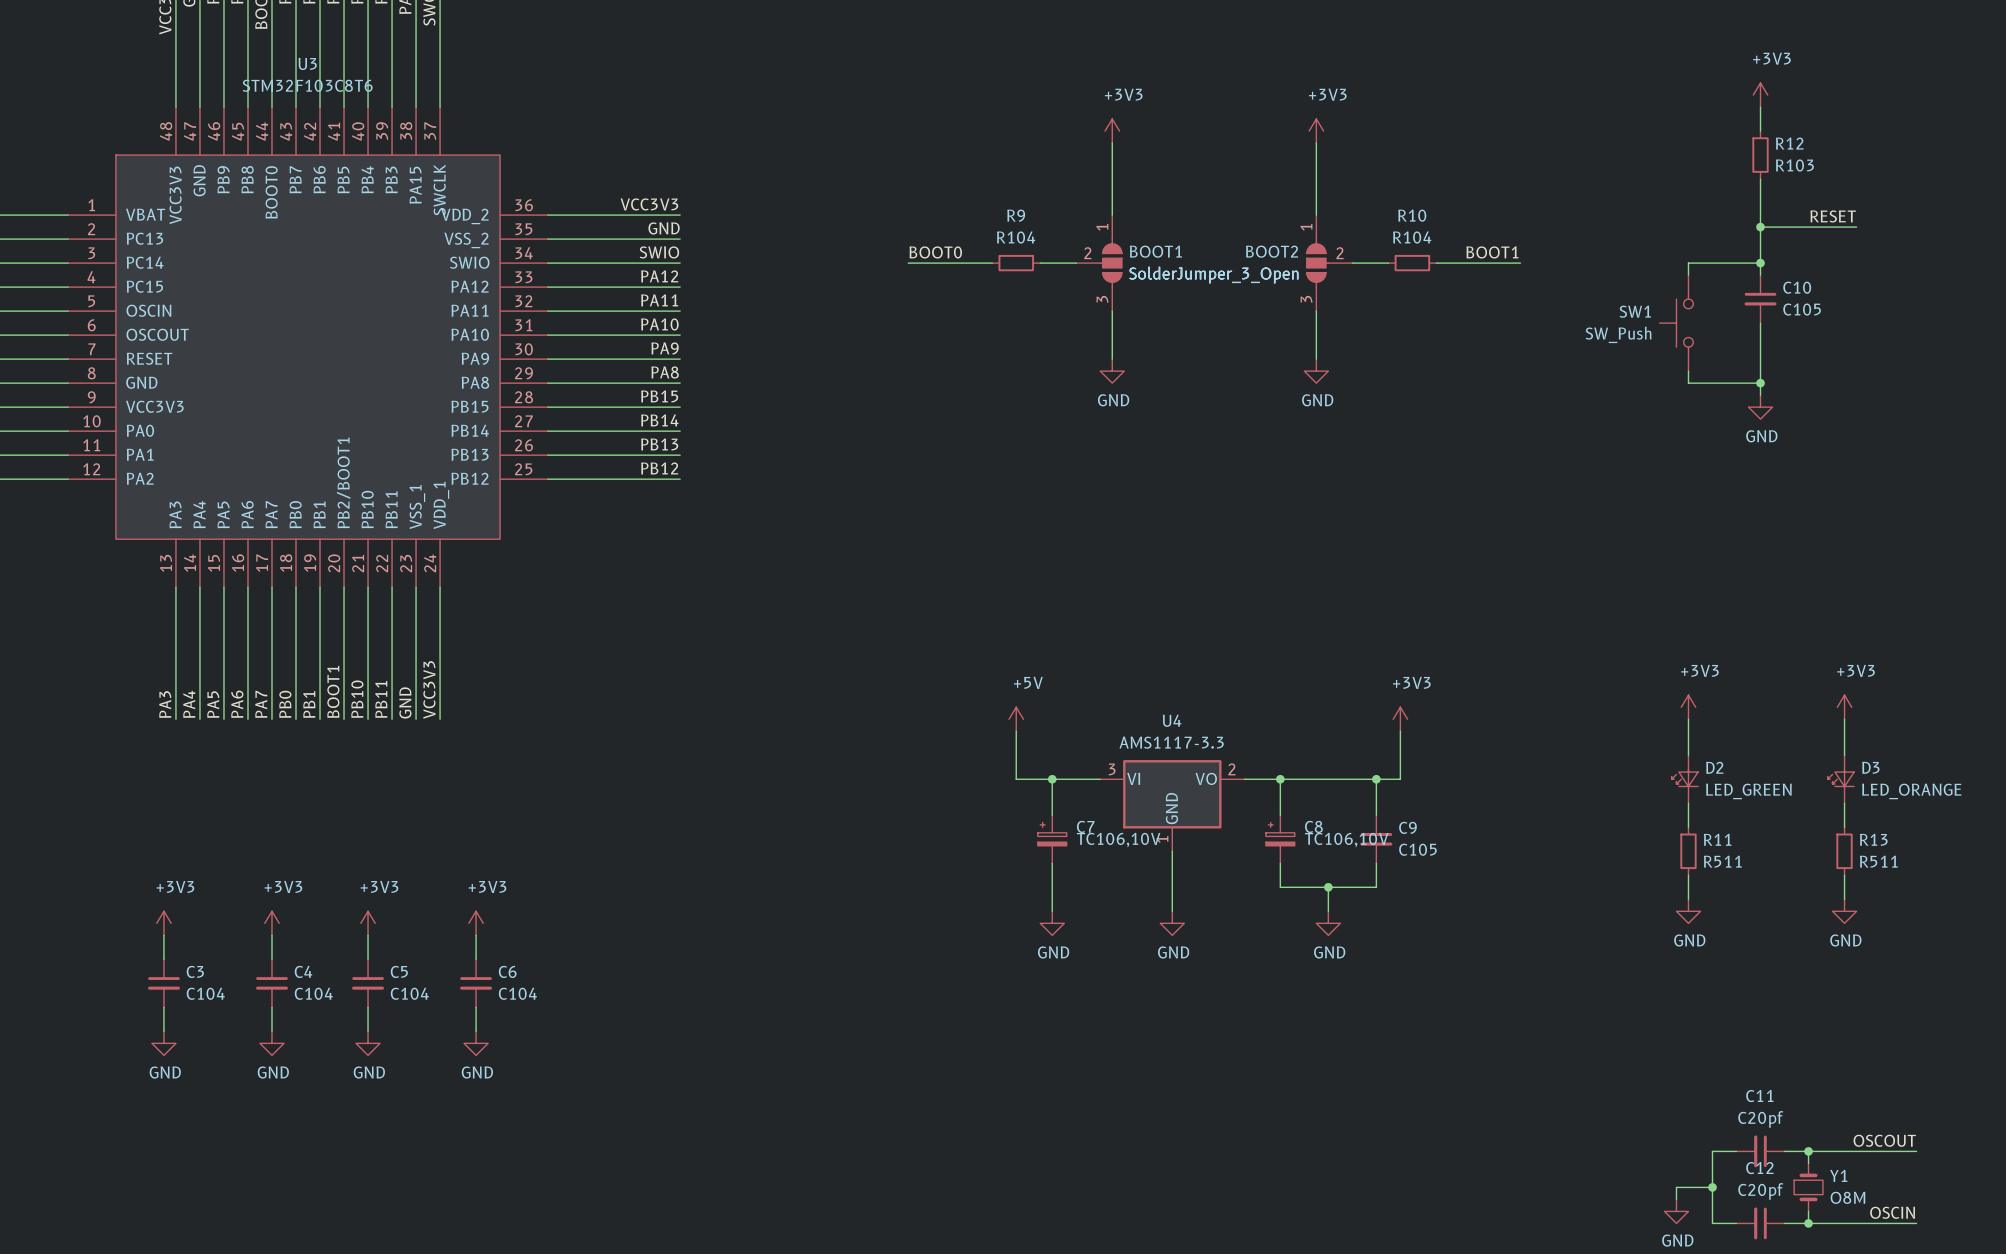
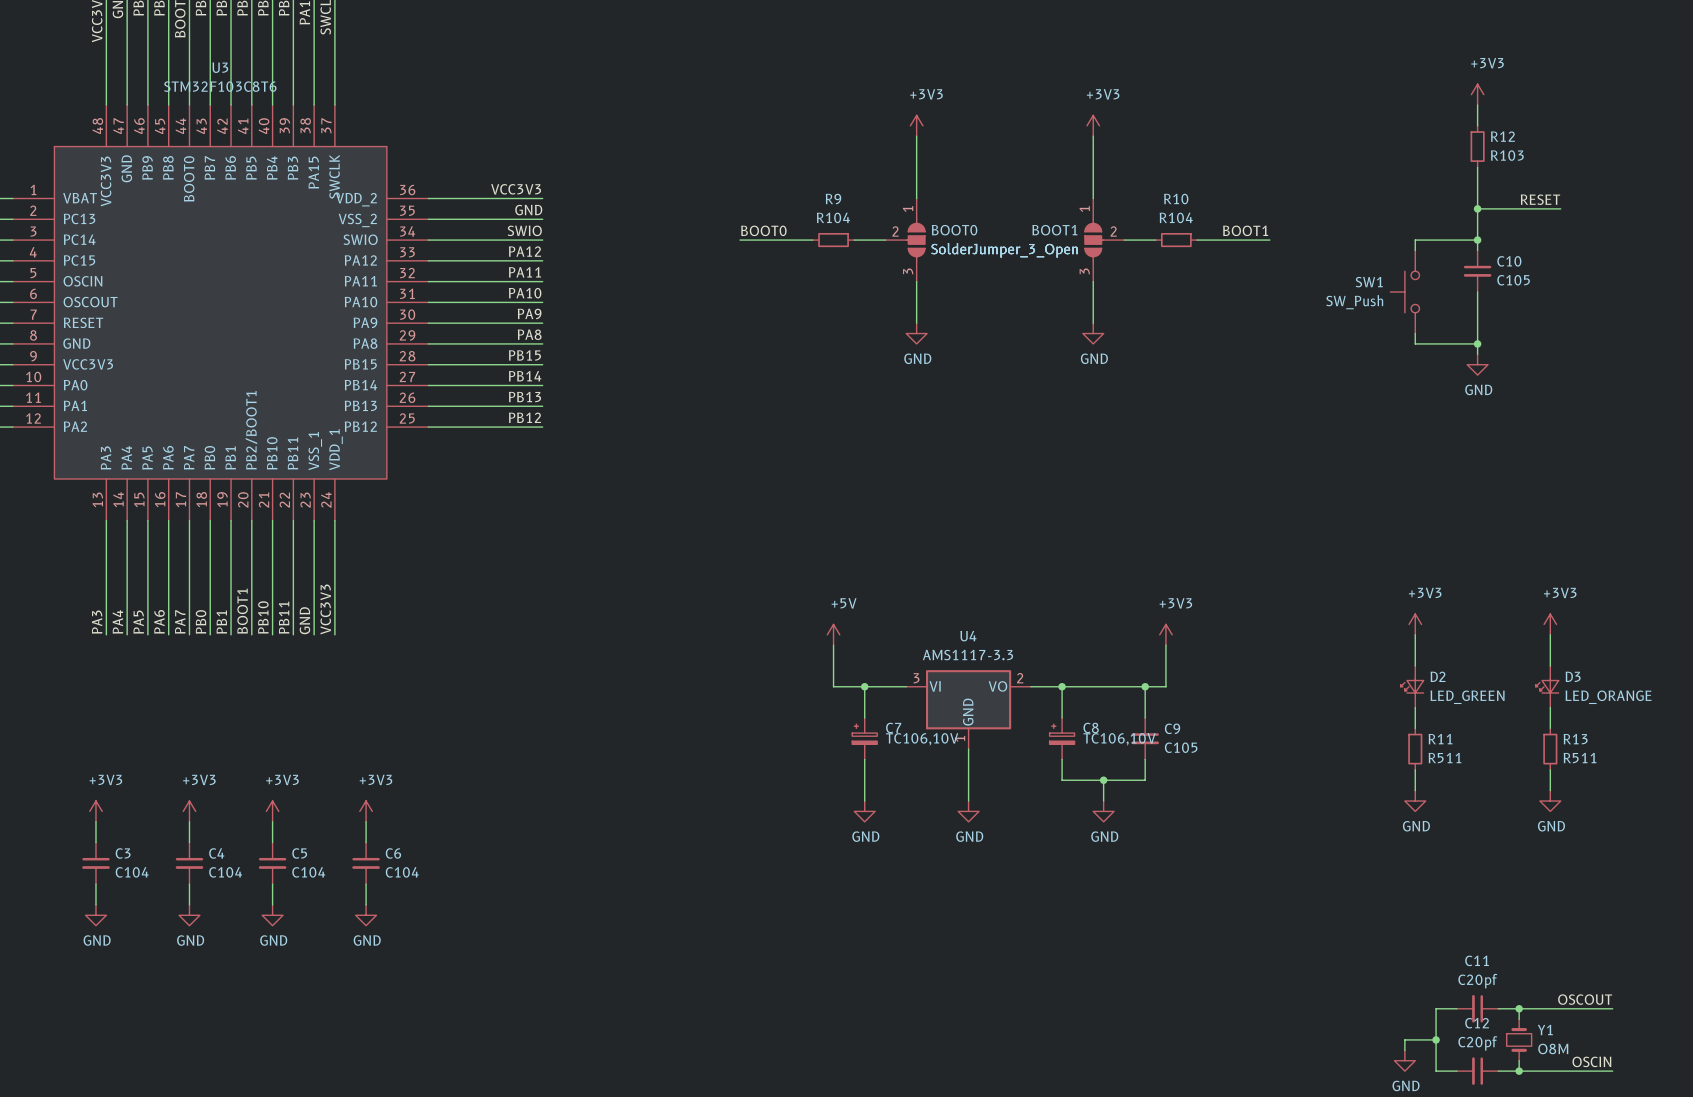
BOOT1 name: BOOT1 (1155, 251) -> BOOT0 (954, 230)
BOOT2 name: BOOT2 (1272, 251) -> BOOT1 (1054, 230)

